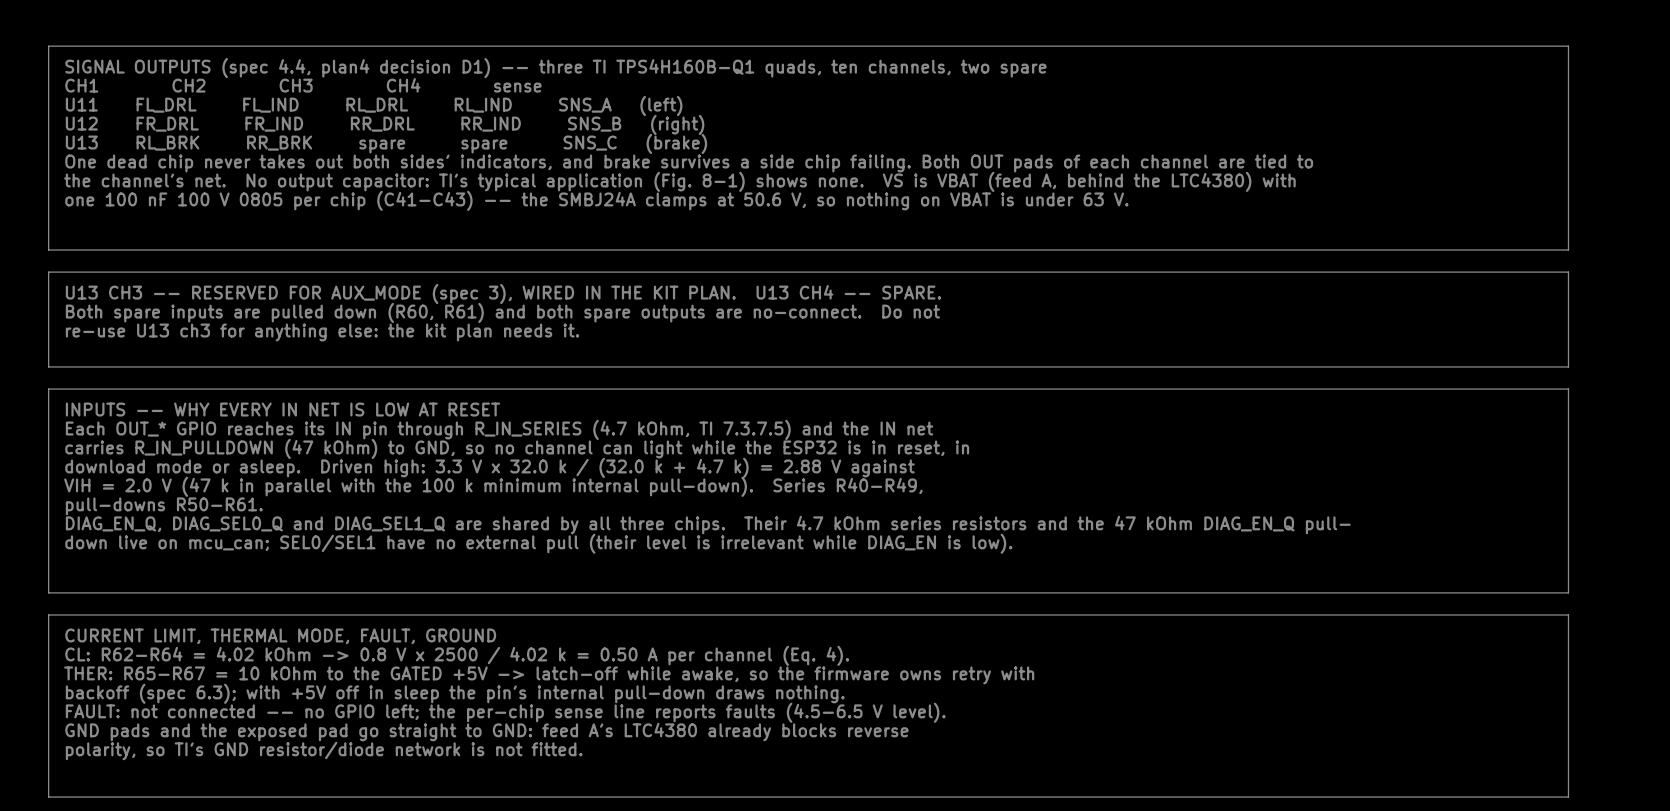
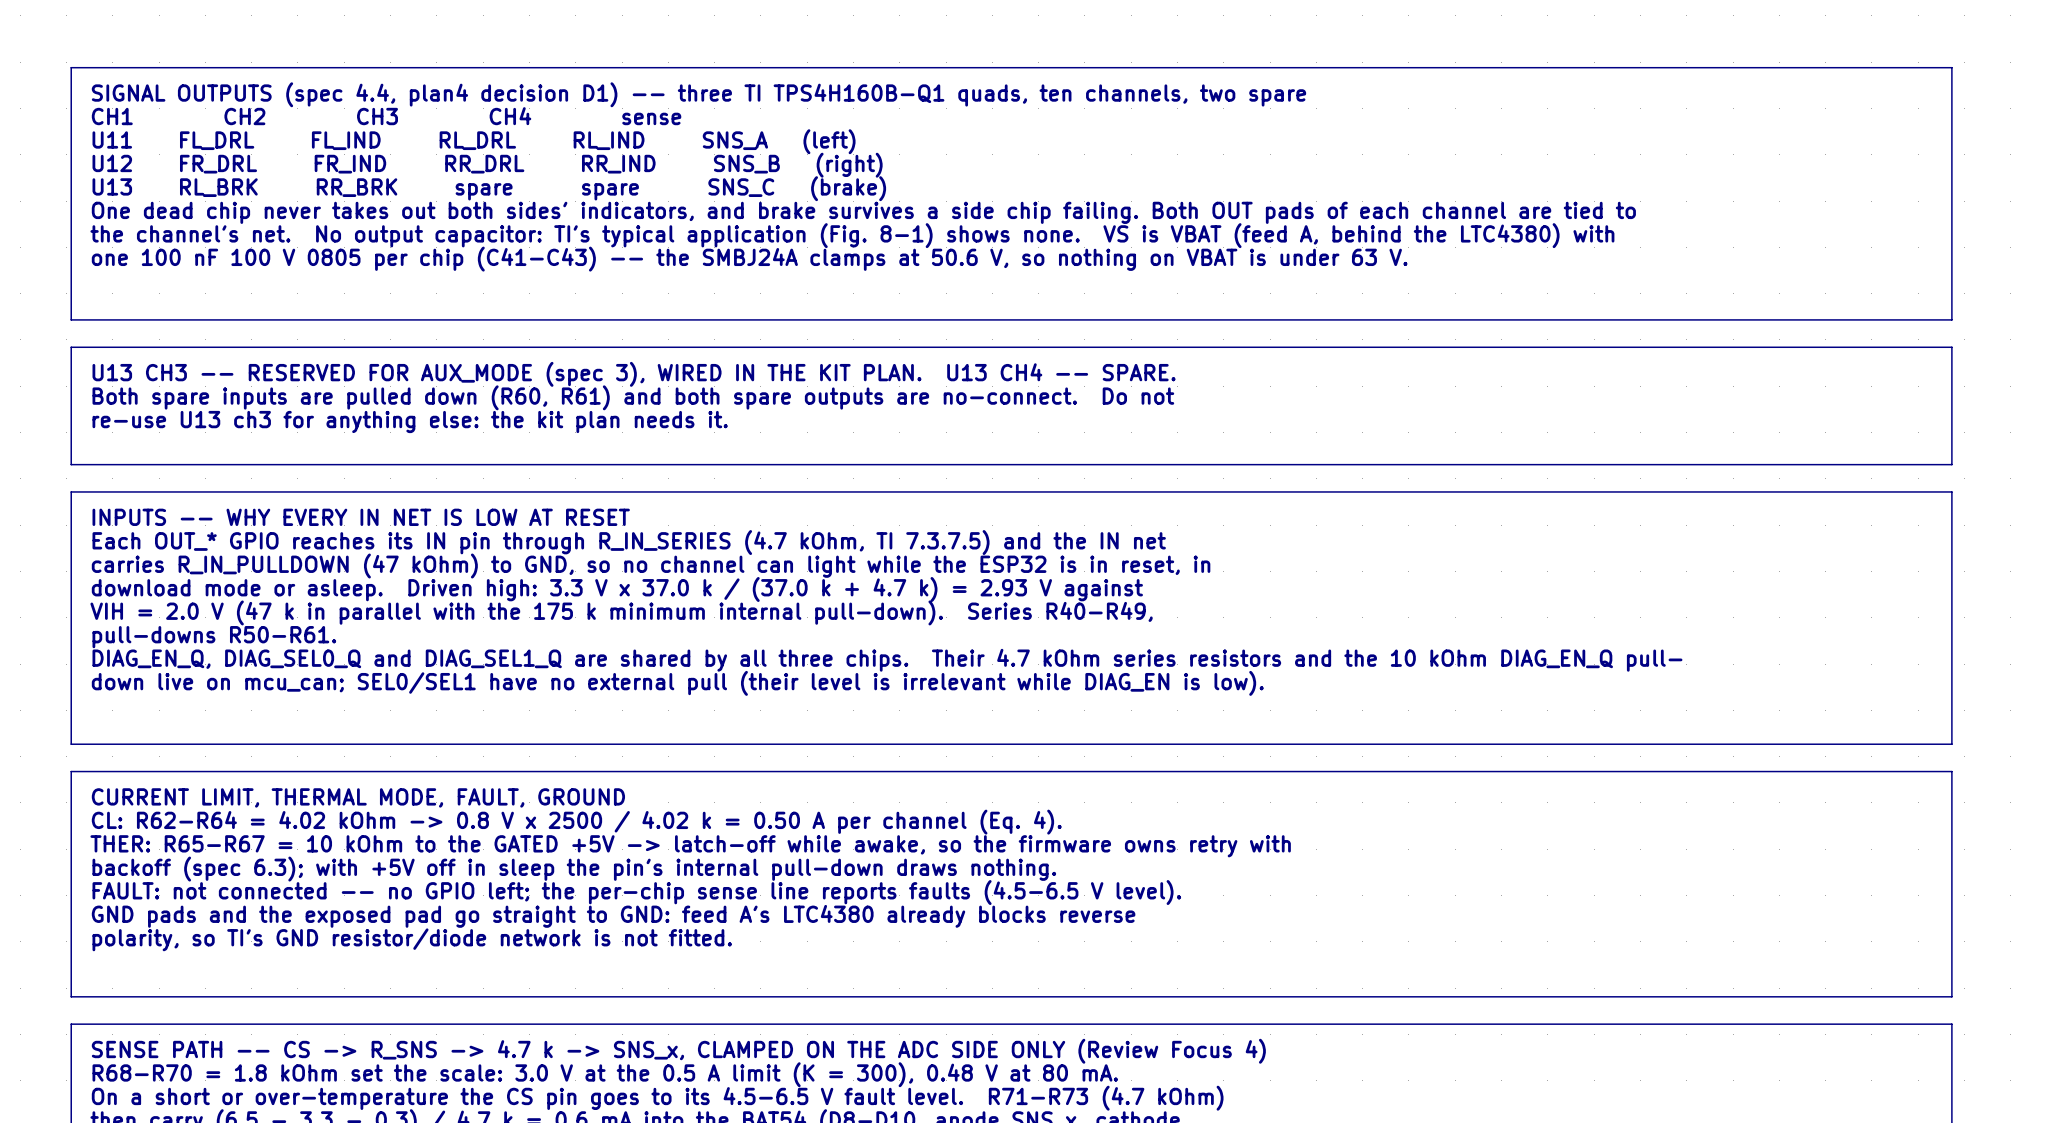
text: download mode or asleep. Driven high: 3.3 V x 32.0 k / (32.0 k + 4.7 k) = 2.88 V against (490, 467) -> download mode or asleep. Driven high: 3.3 V x 37.0 k / (37.0 k + 4.7 k) = 2.93 V against (617, 589)
text: VIH = 2.0 V (47 k in parallel with the 100 k minimum internal pull-down). Series R40-R49, (493, 486) -> VIH = 2.0 V (47 k in parallel with the 175 k minimum internal pull-down). Series R40-R49, (621, 612)
text: DIAG_EN_Q, DIAG_SEL0_Q and DIAG_SEL1_Q are shared by all three chips. Their 4.7 kOhm series resistors and the 47 kOhm DIAG_EN_Q pull- (708, 525) -> DIAG_EN_Q, DIAG_SEL0_Q and DIAG_SEL1_Q are shared by all three chips. Their 4.7 kOhm series resistors and the 10 kOhm DIAG_EN_Q pull- (887, 660)

